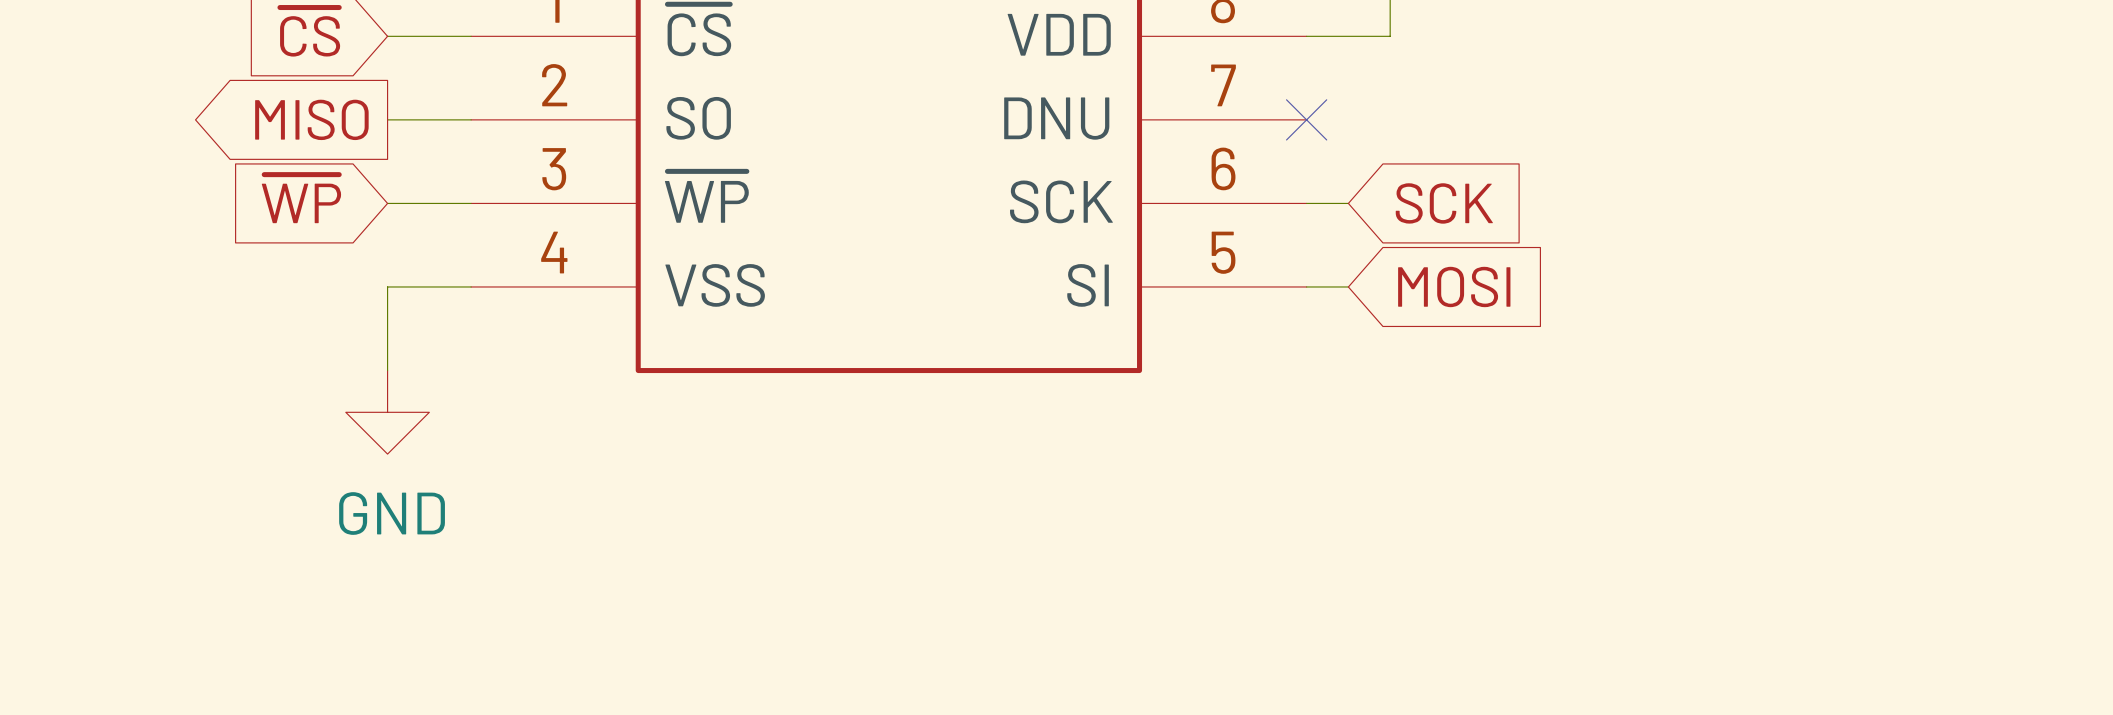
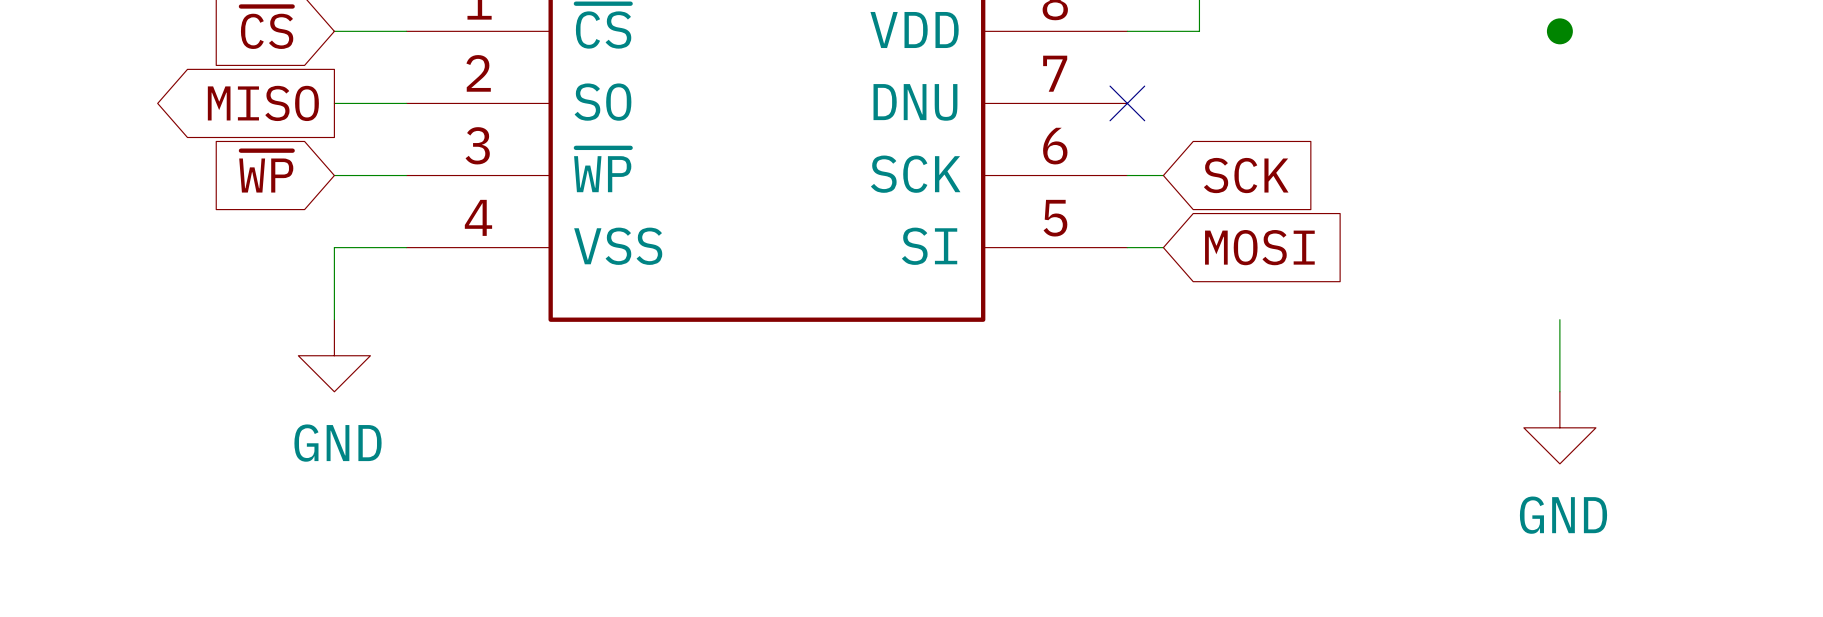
junction: none -> (1559, 31)
wire: none -> (1559, 319) (1559, 391)
power symbol: none -> GND (1559, 427)

